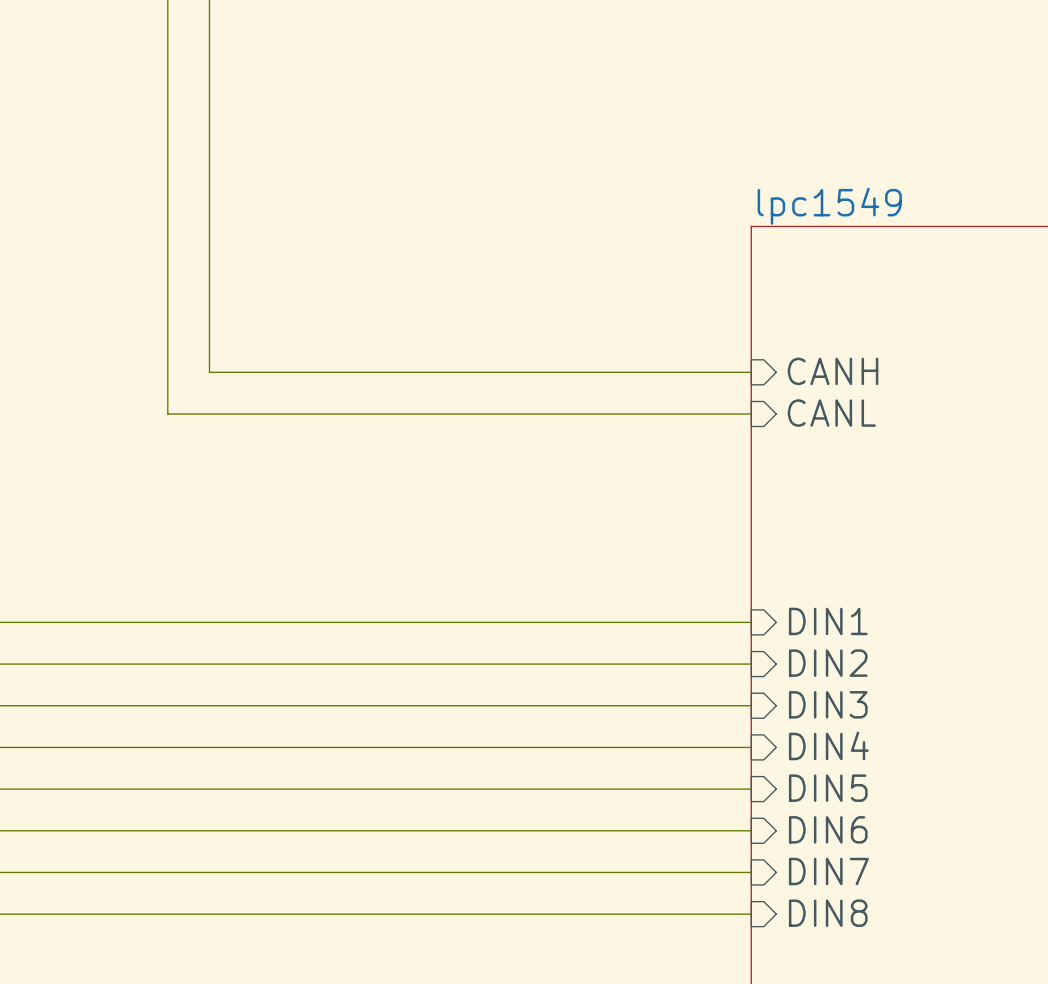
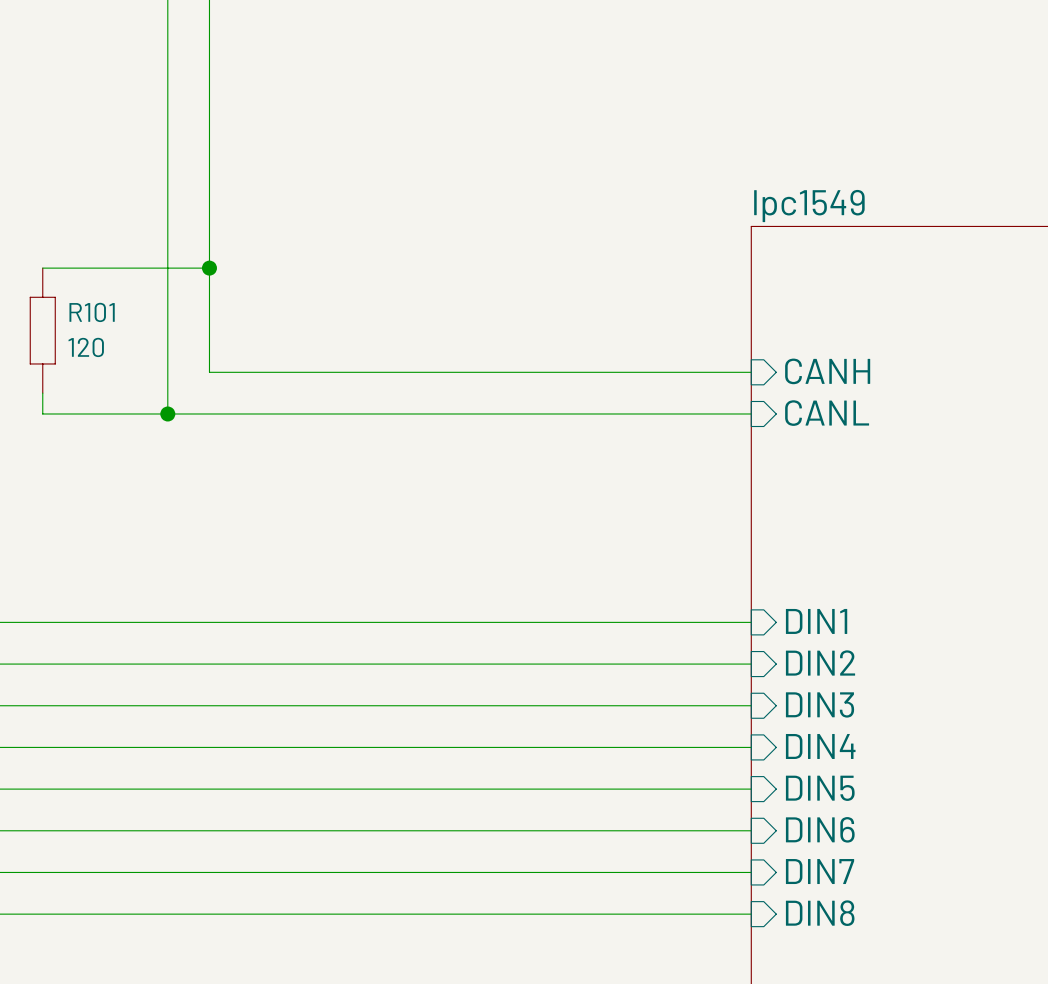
wire: none -> (42, 268) (209, 268)
junction: none -> (209, 268)
R101: none -> 120 (42, 330)
wire: none -> (42, 393) (42, 413) (167, 413)
junction: none -> (167, 413)

